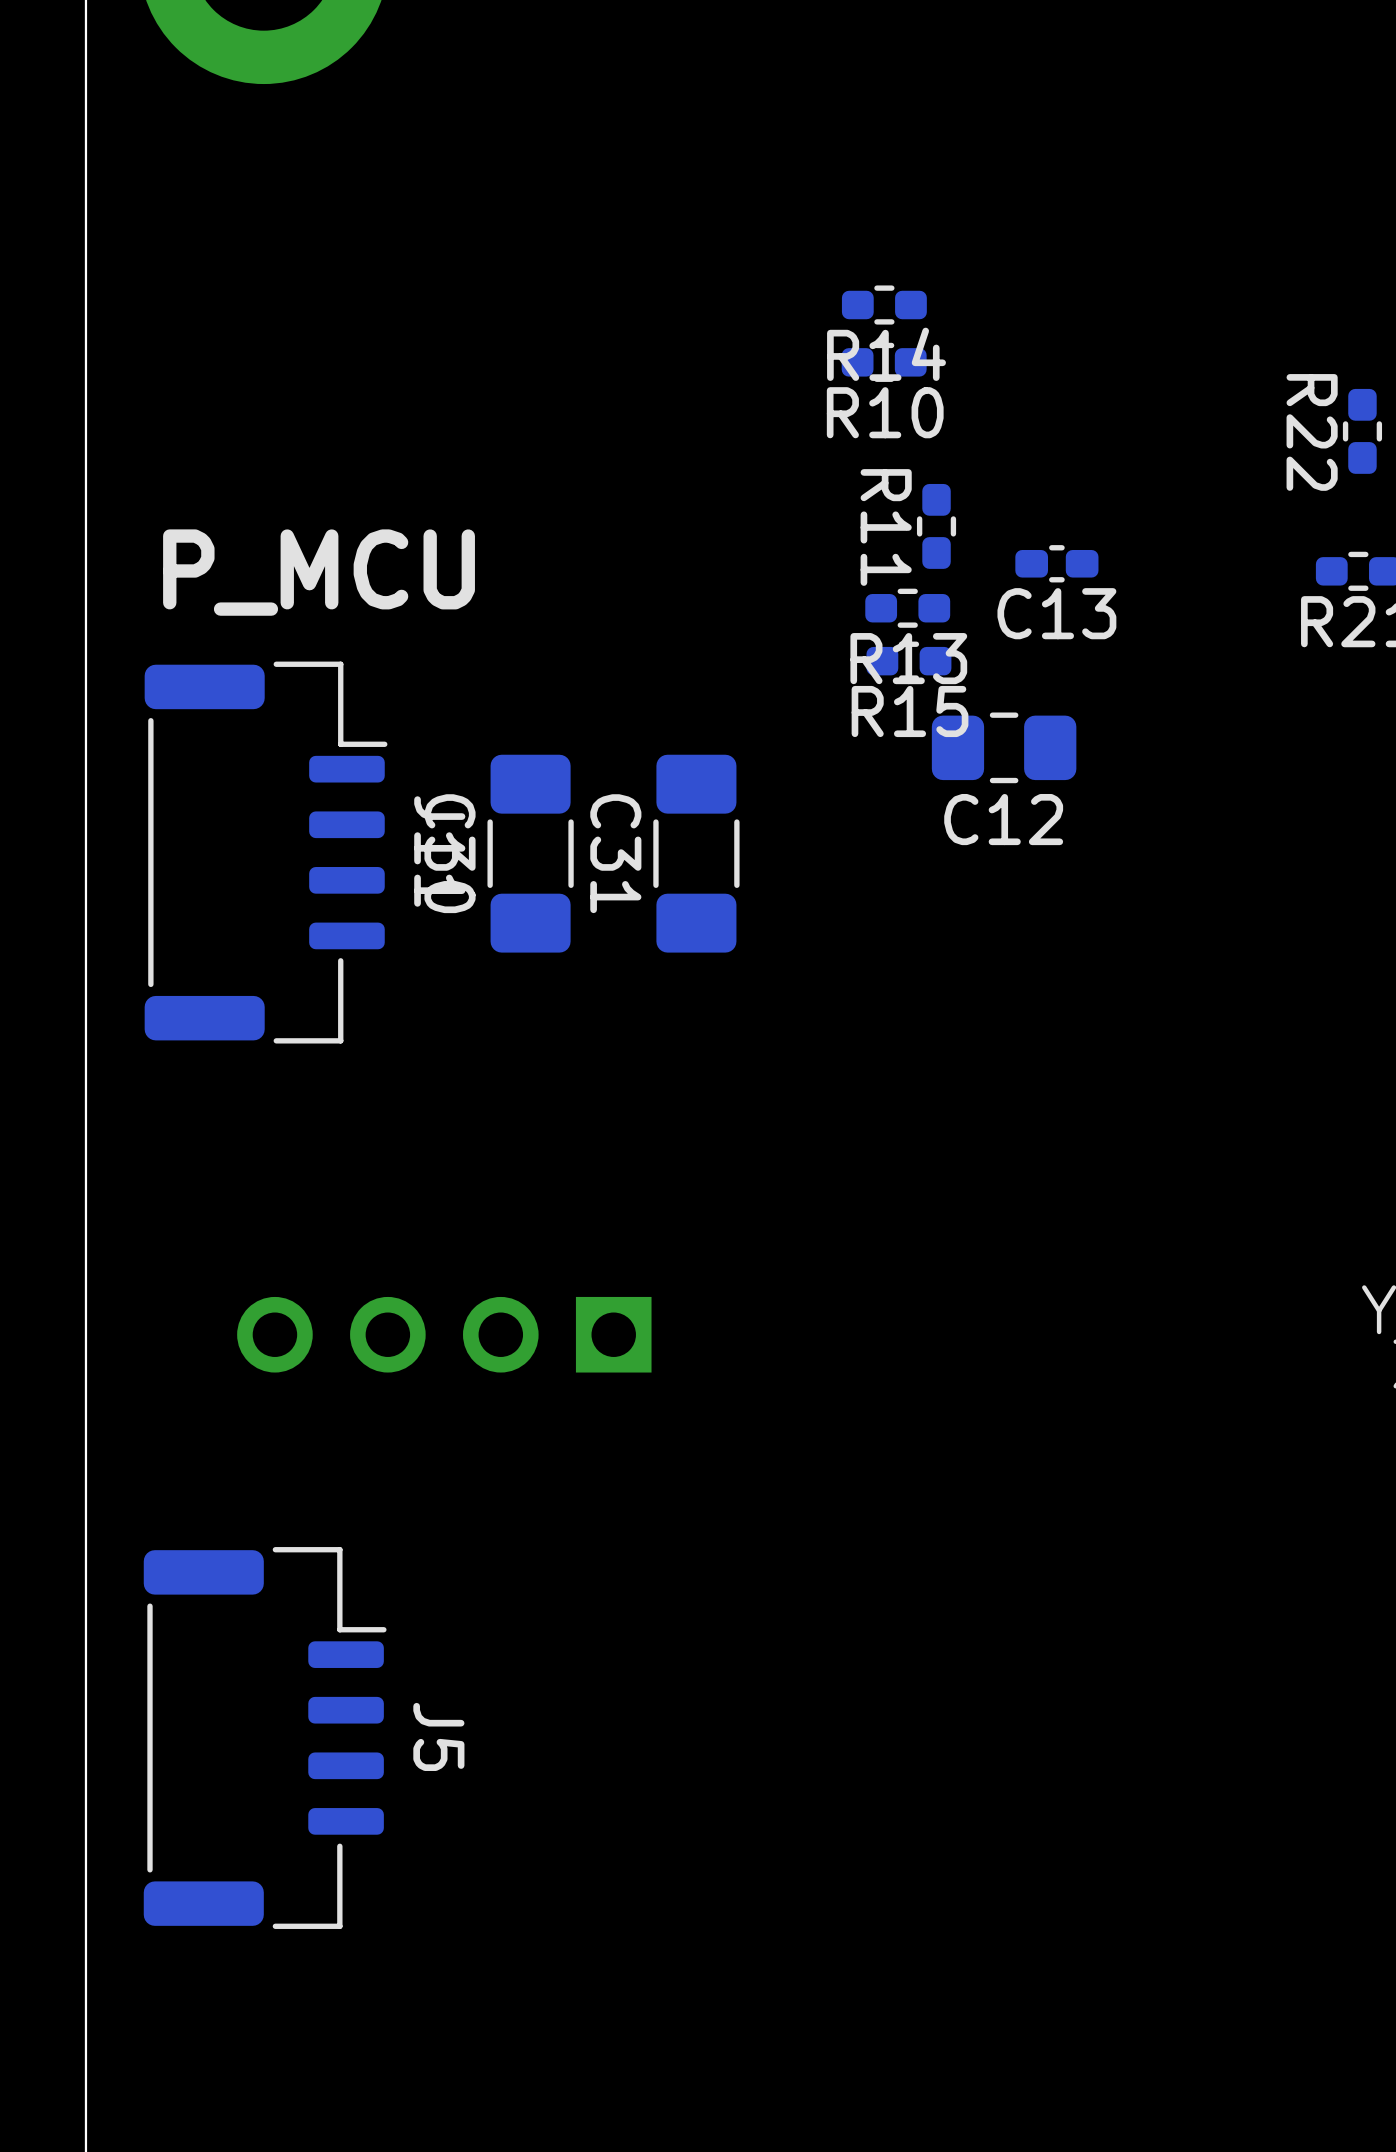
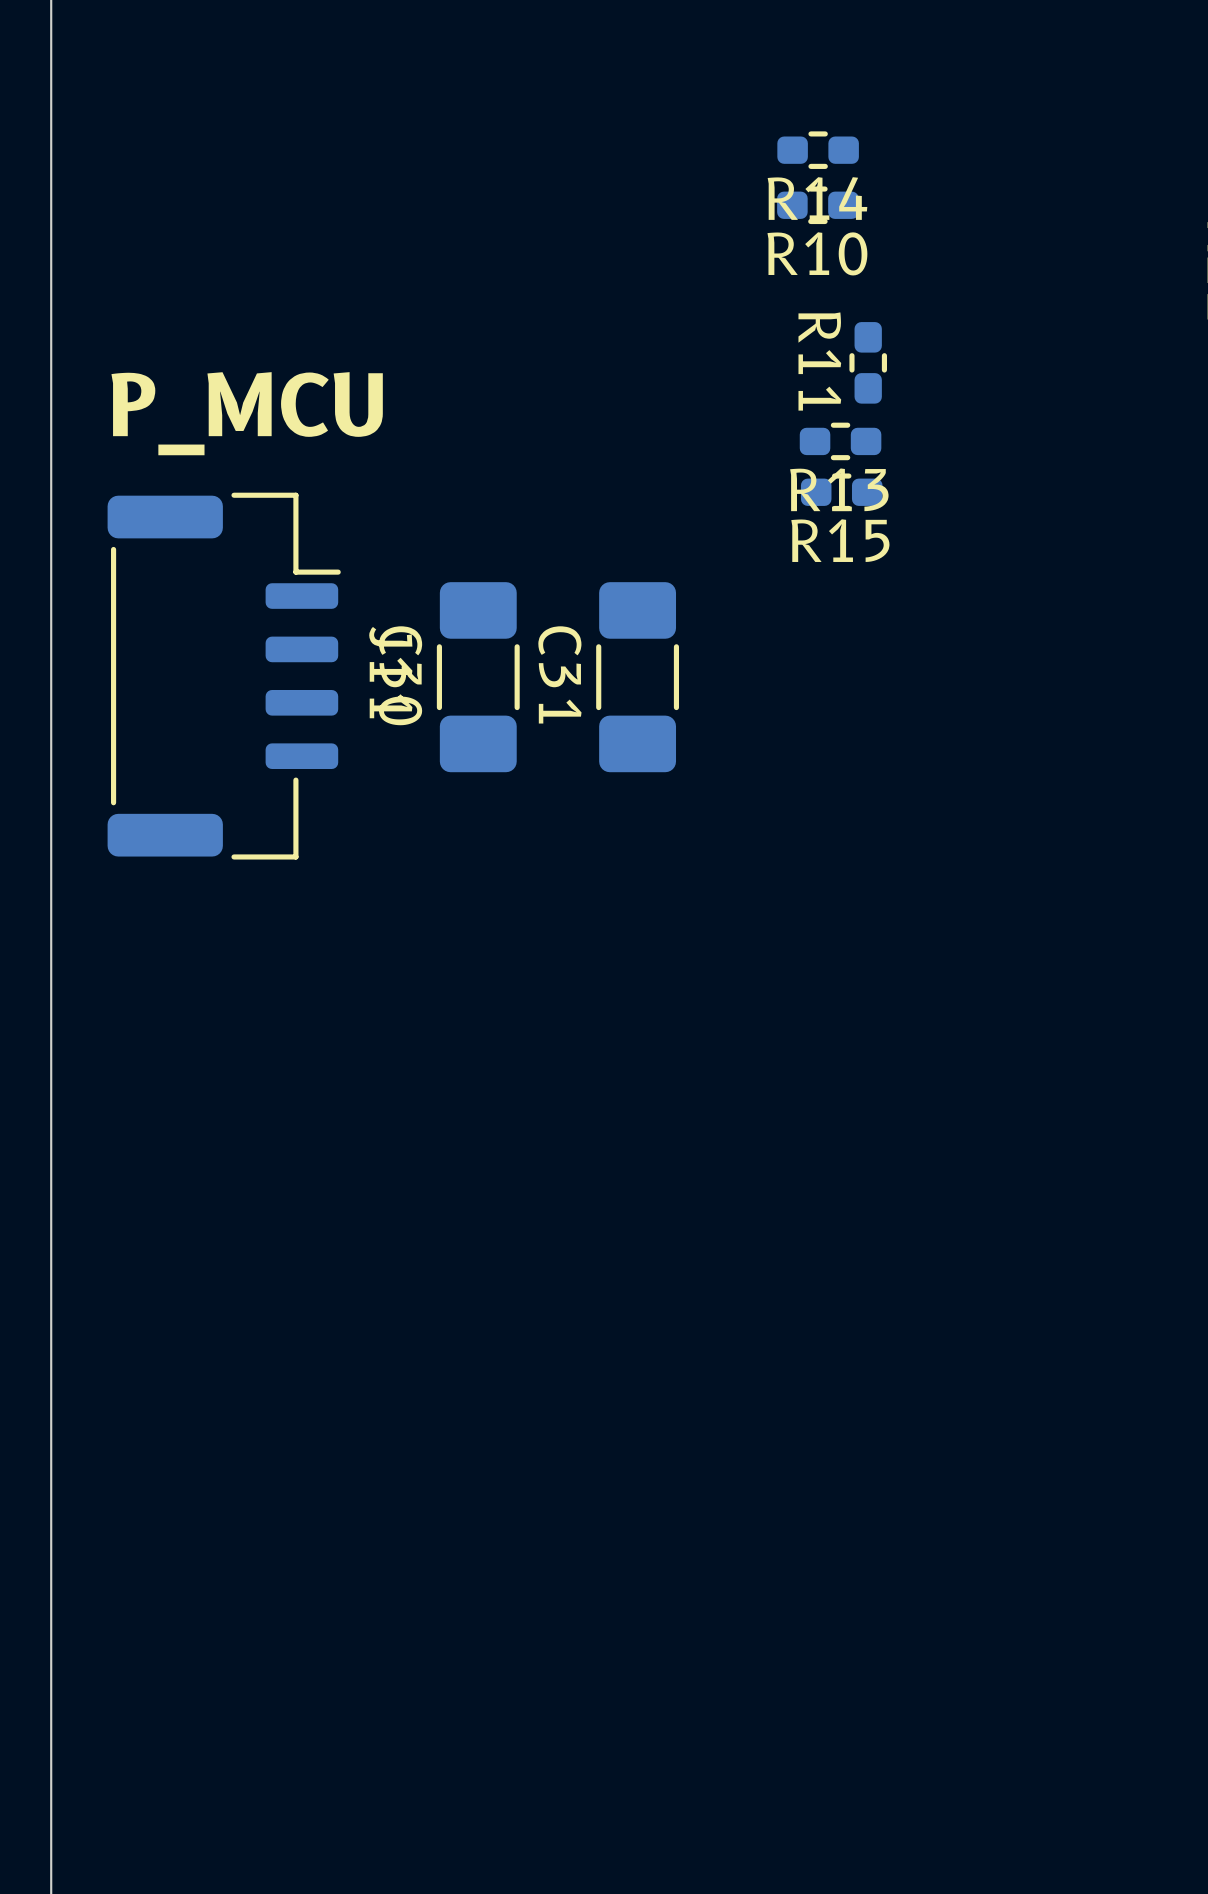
C13: (1056, 563) -> none
C12: (1004, 747) -> none
part: (444, 1334) -> none
J5: (265, 1738) -> none

